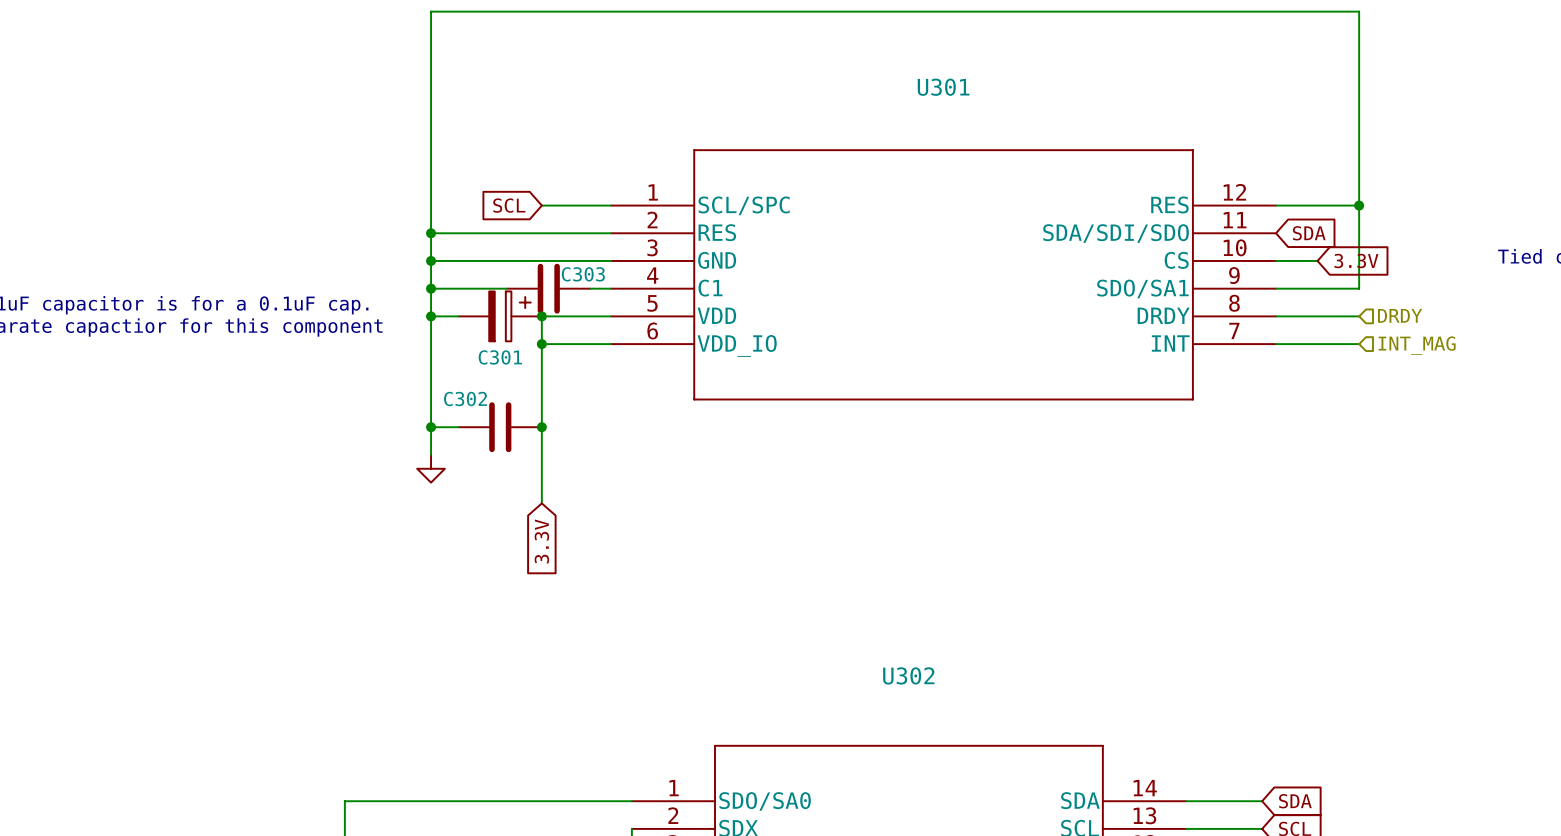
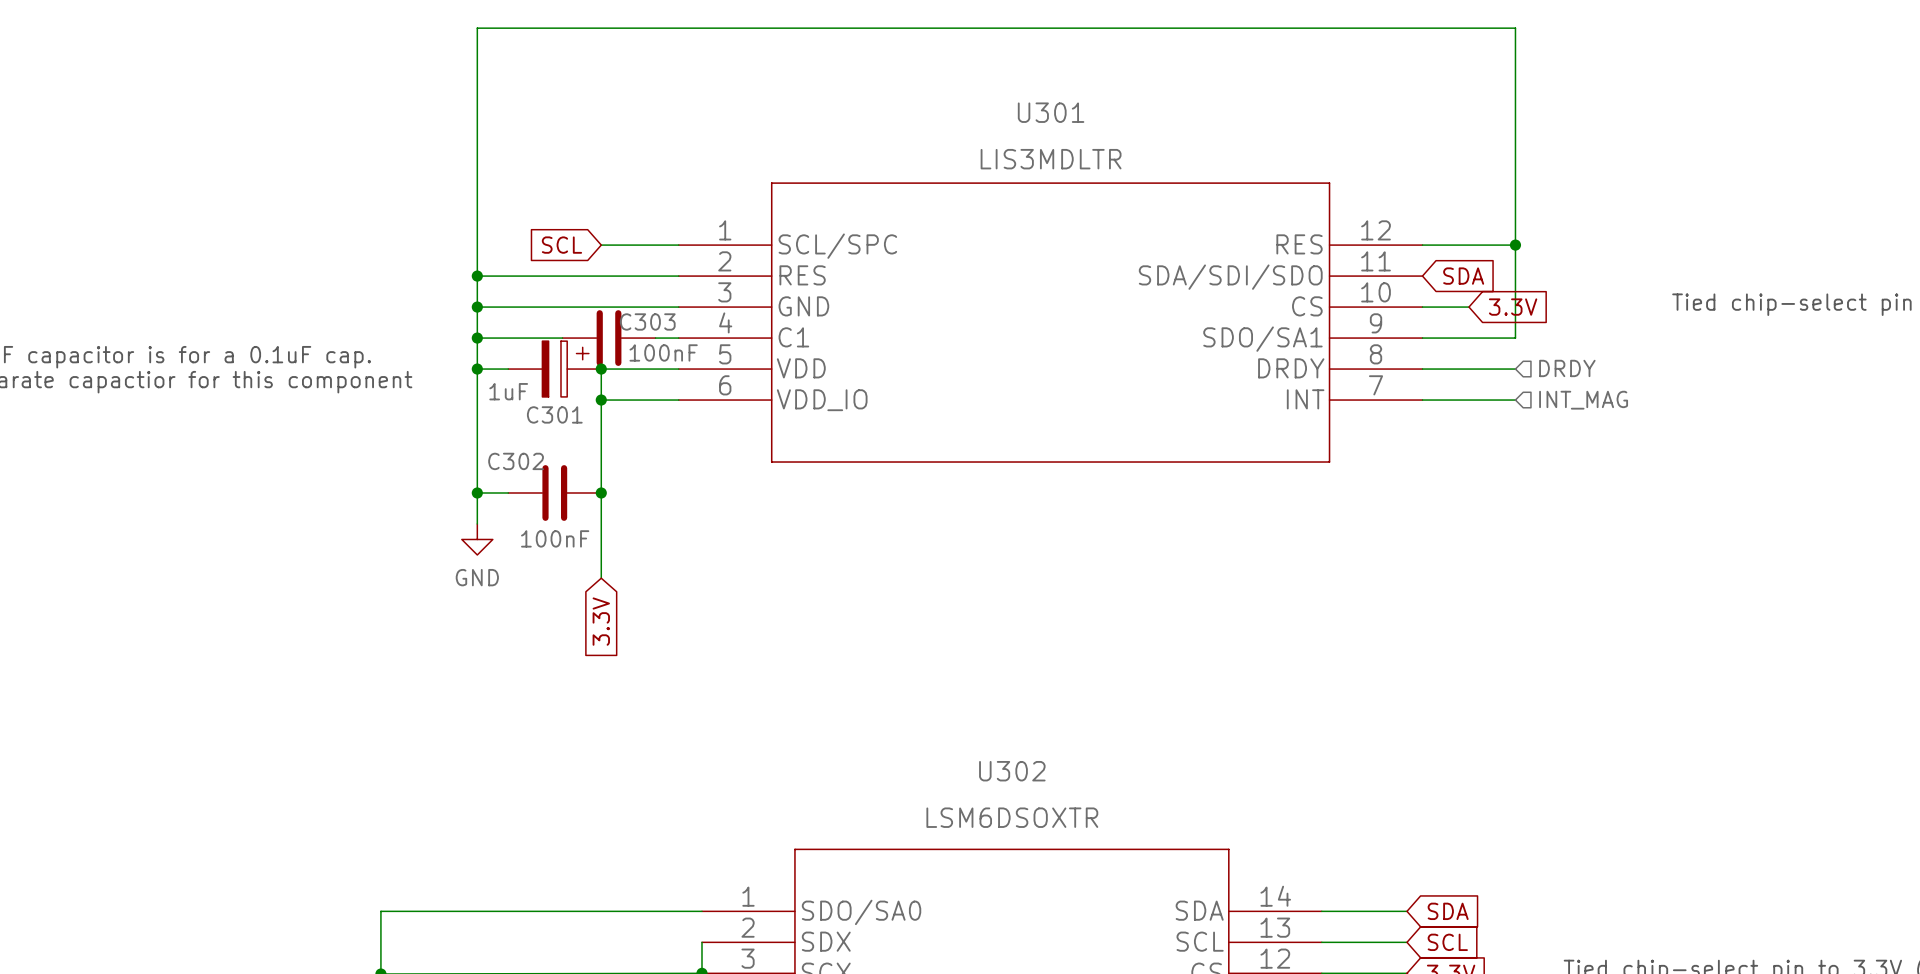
U301 value: none -> LIS3MDLTR (1051, 159)
C303 value: none -> 100nF (663, 352)
C301 value: none -> 1uF (508, 391)
C302 value: none -> 100nF (555, 538)
power symbol text: none -> GND (477, 577)
U302 value: none -> LSM6DSOXTR (1012, 817)

